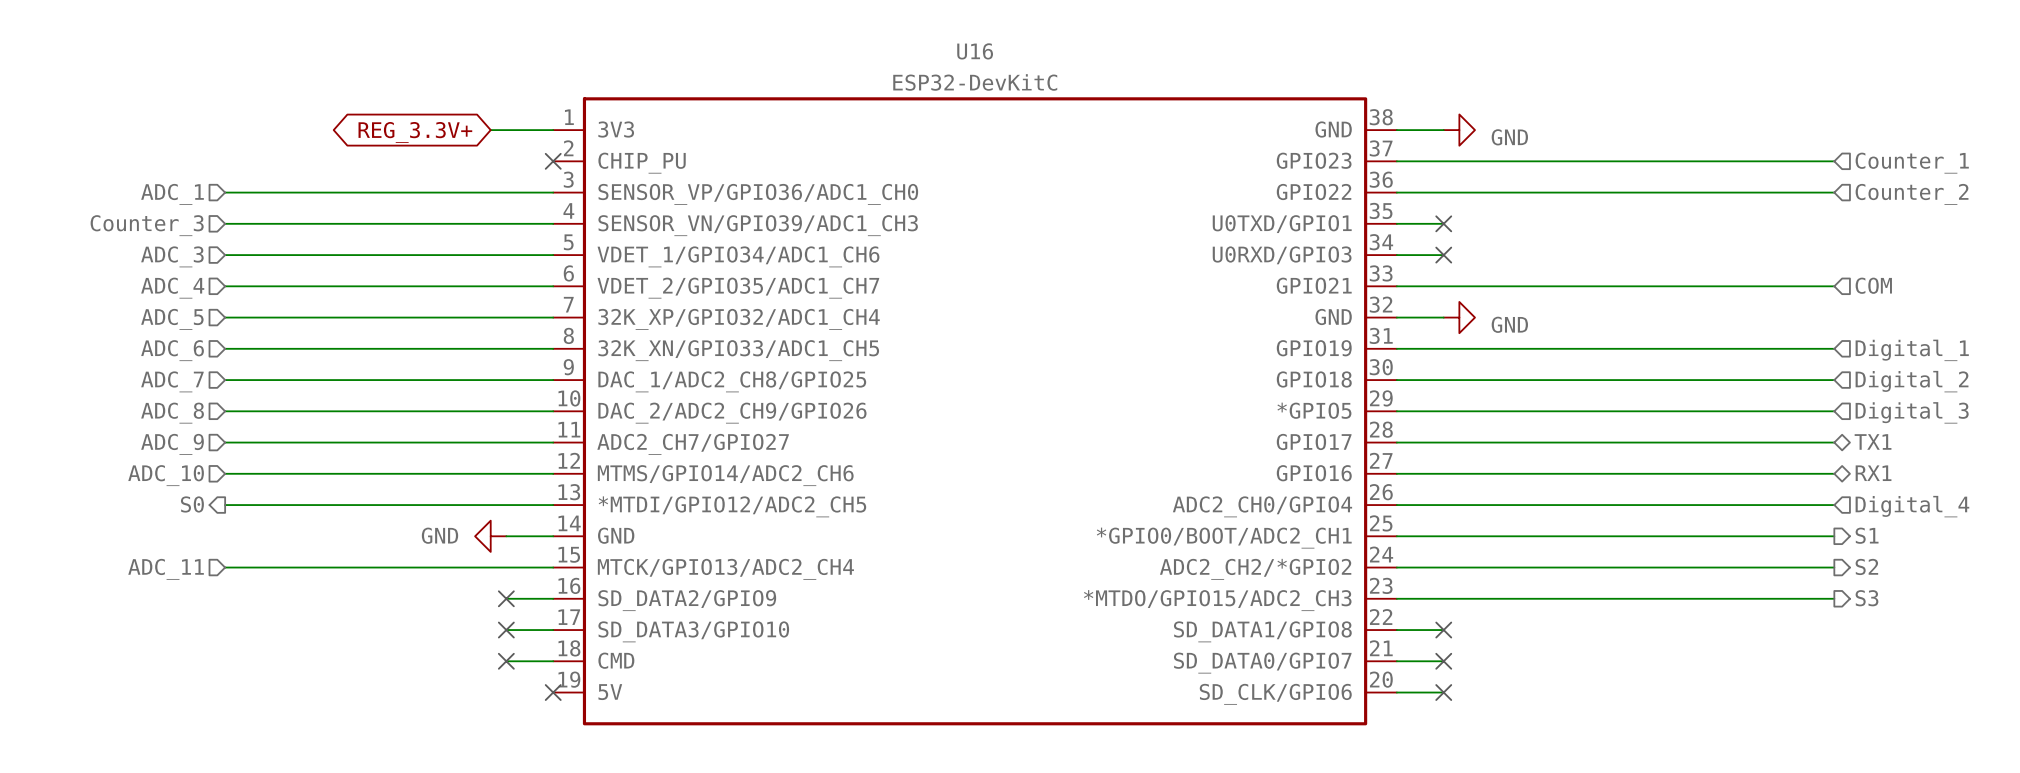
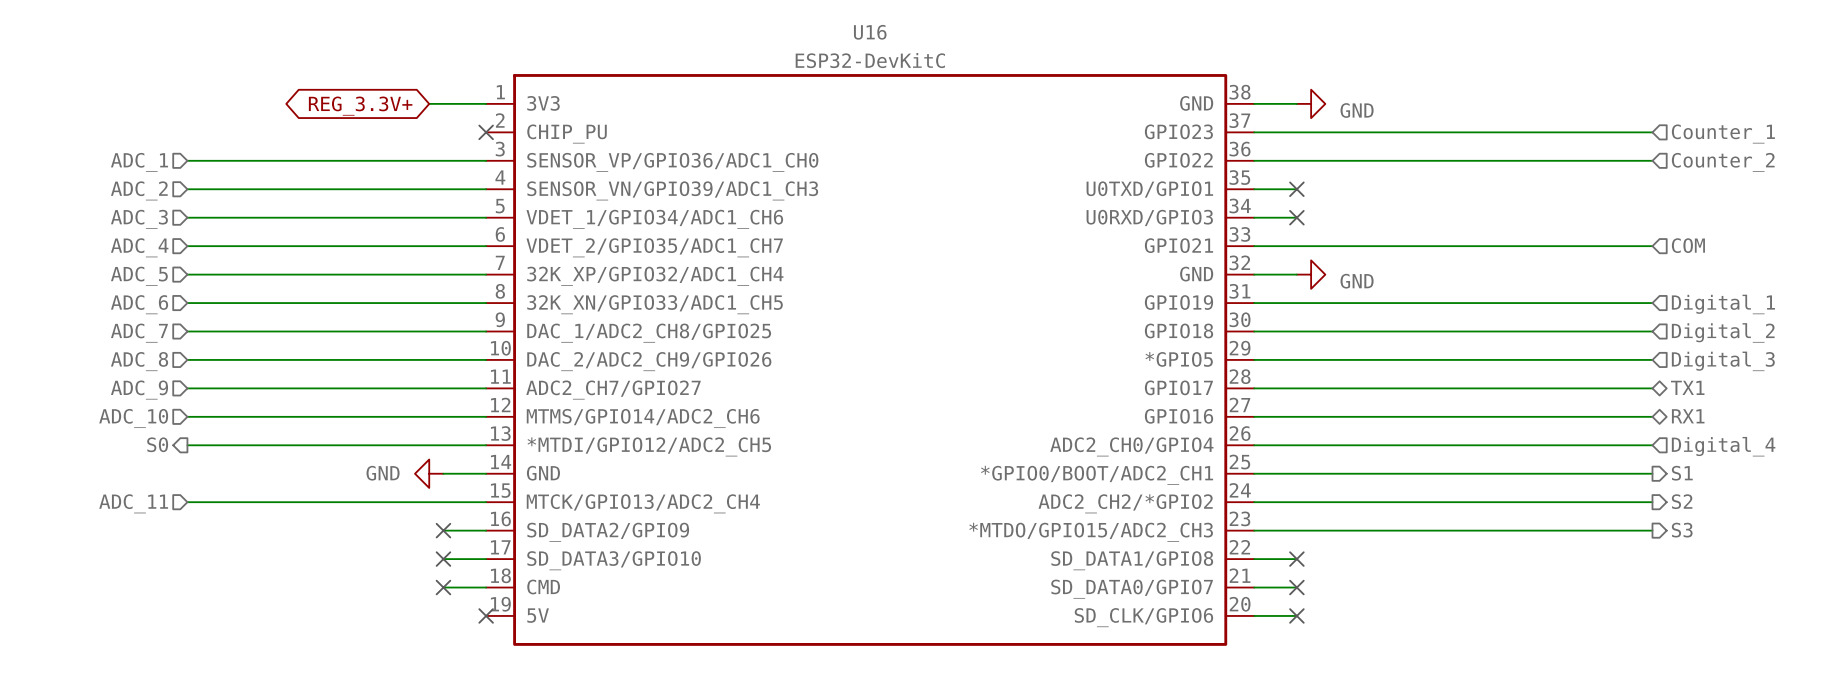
hierarchical label: Counter_3 (147, 225) -> ADC_2 (139, 190)

